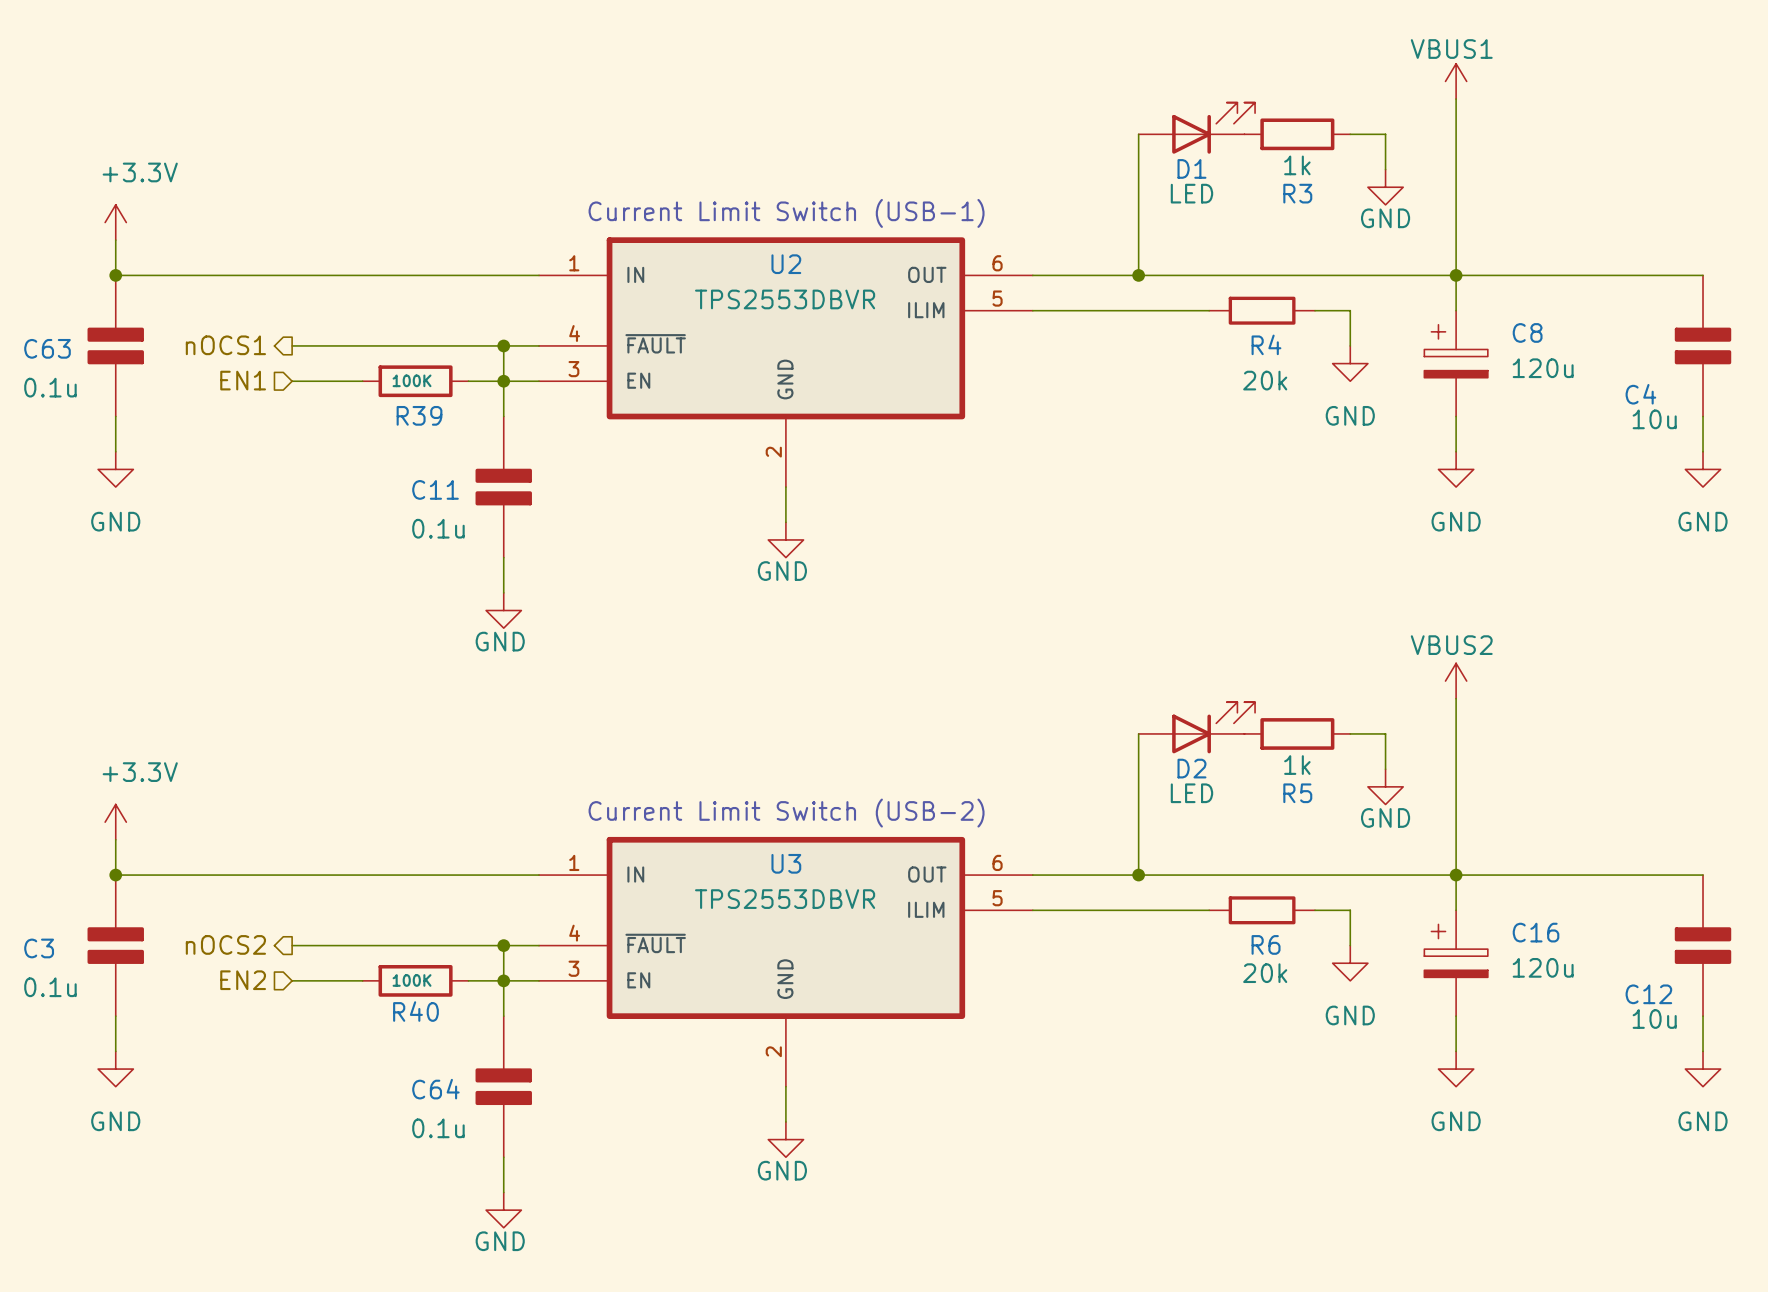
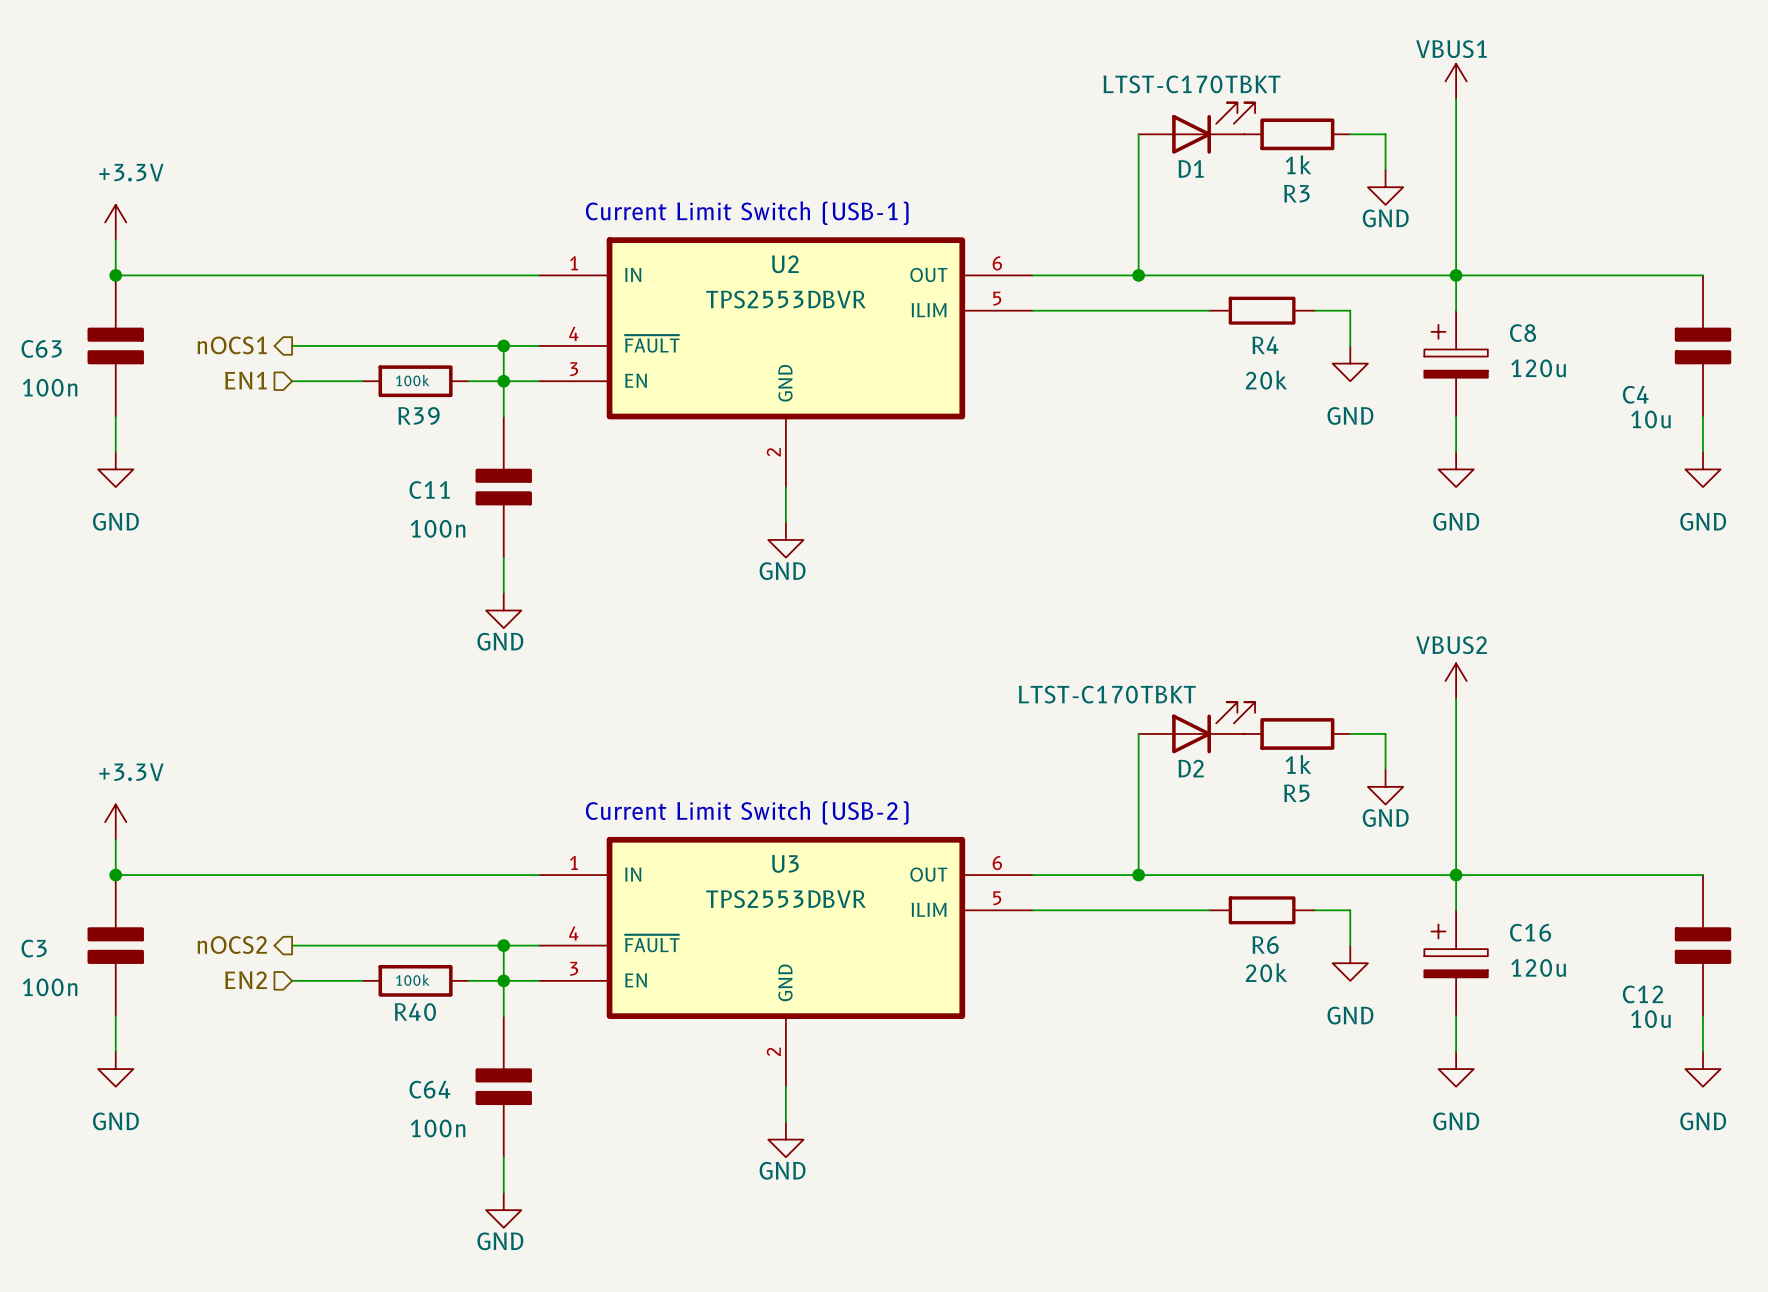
D1 value: LED (1191, 193) -> LTST-C170TBKT (1191, 84)
R39 value: 100K (412, 380) -> 100k (412, 380)
C63 value: 0.1u (50, 387) -> 100n (50, 387)
C11 value: 0.1u (438, 528) -> 100n (438, 528)
D2 value: LED (1191, 793) -> LTST-C170TBKT (1107, 694)
R40 value: 100K (412, 980) -> 100k (412, 980)
C3 value: 0.1u (50, 987) -> 100n (50, 987)
C64 value: 0.1u (438, 1128) -> 100n (438, 1128)

